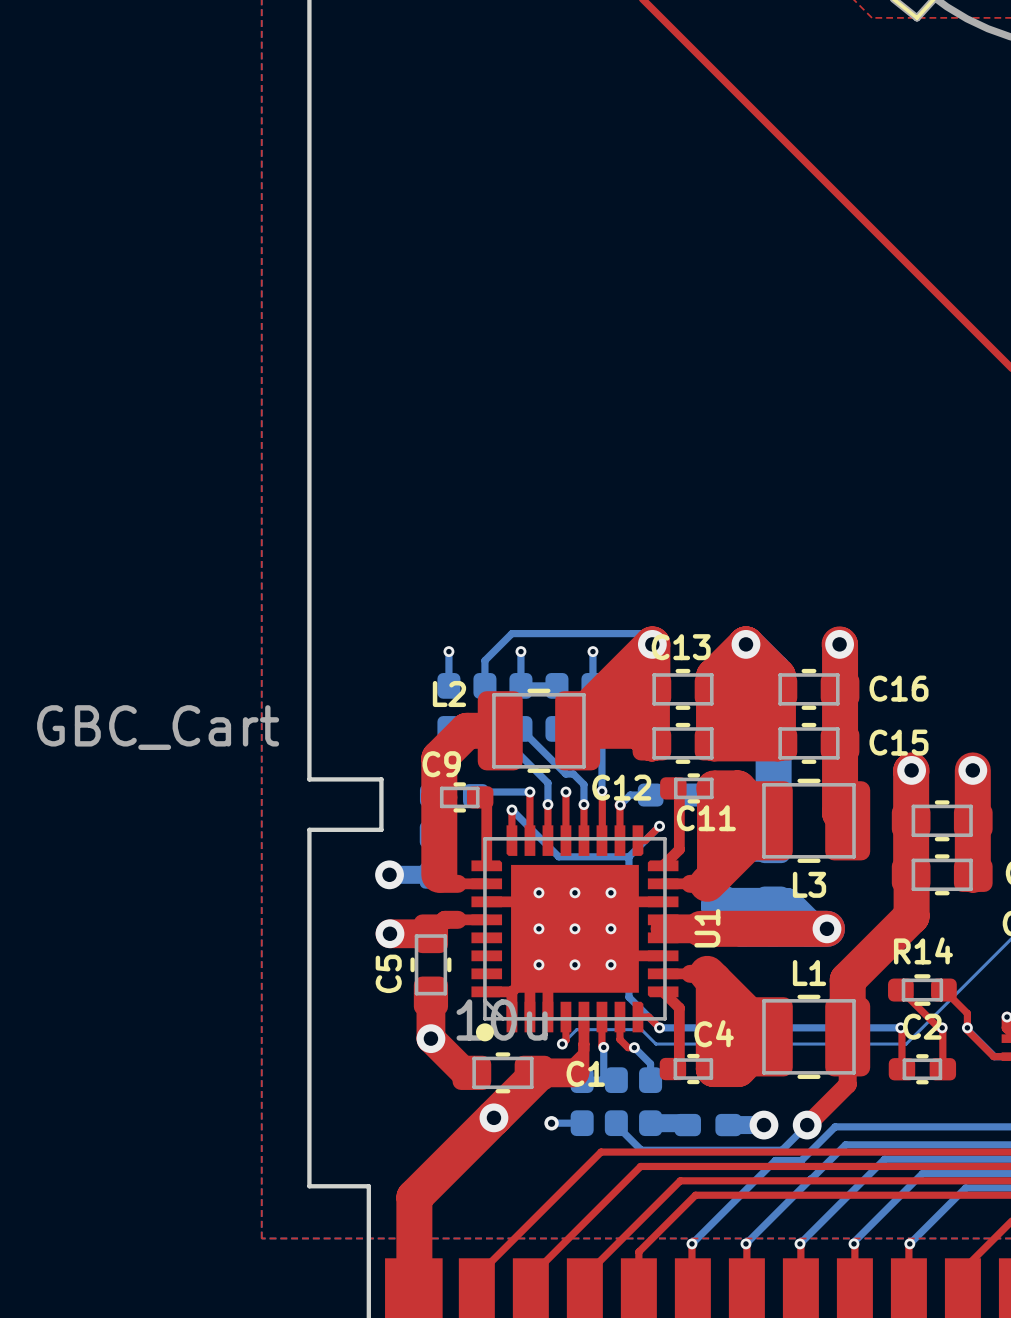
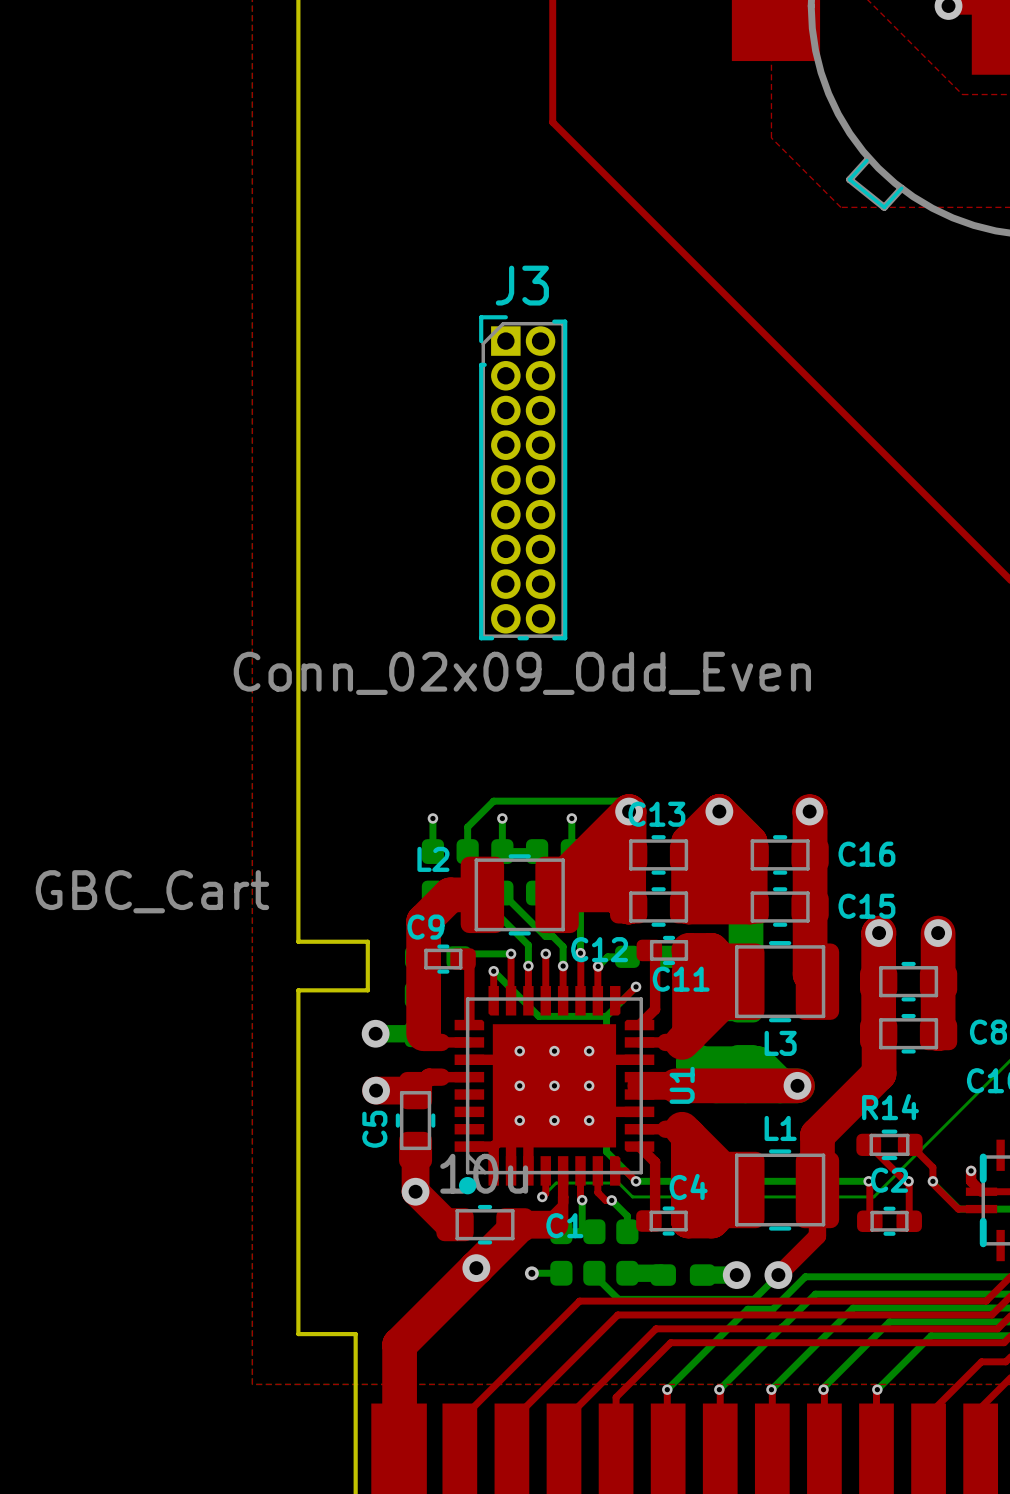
J3: none -> Conn_02x09_Odd_Even (523, 477)

